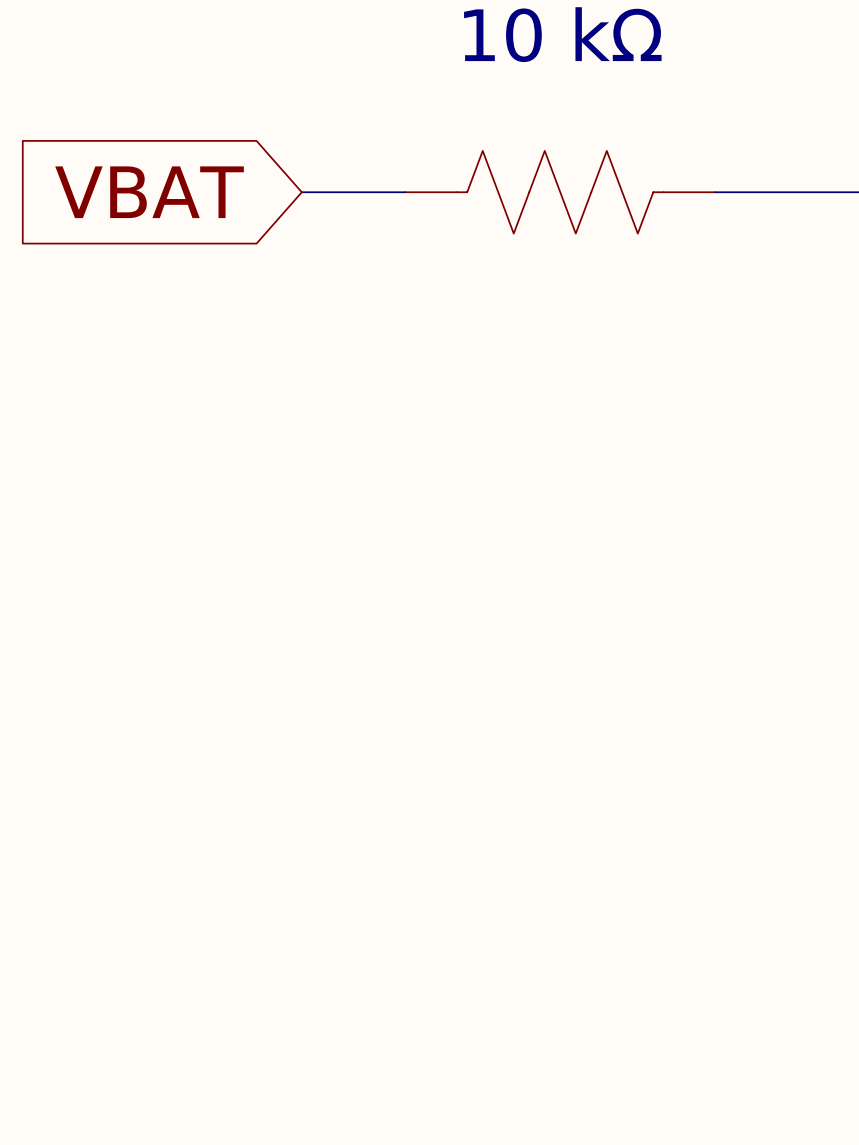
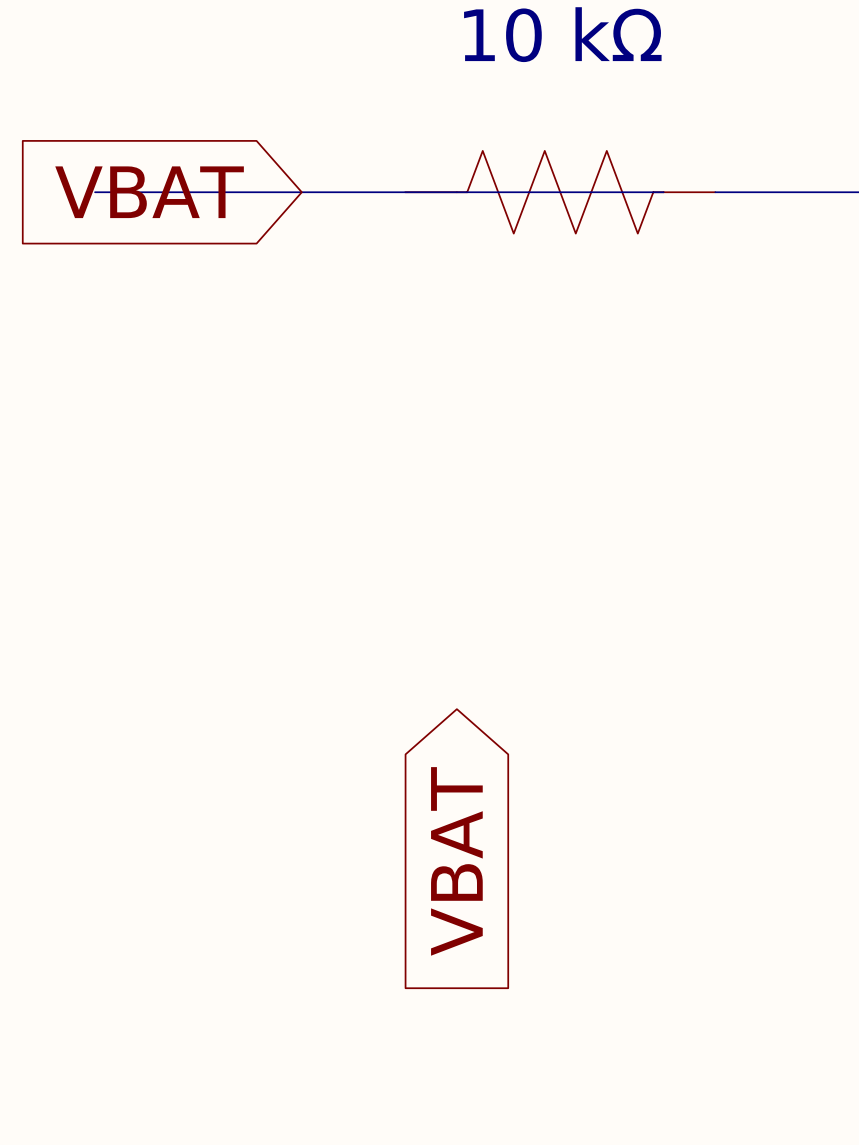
wire: none -> (95, 192) (301, 192)
wire: none -> (405, 192) (663, 192)
global label: none -> VBAT (456, 861)

